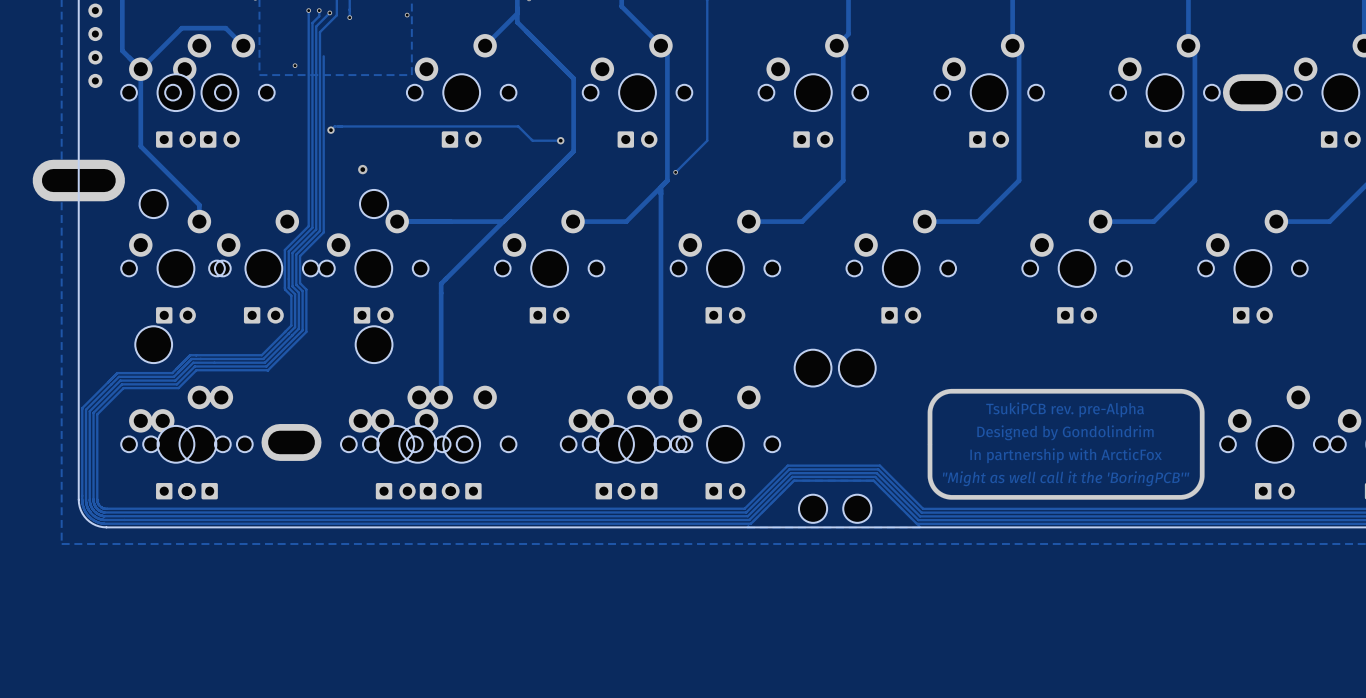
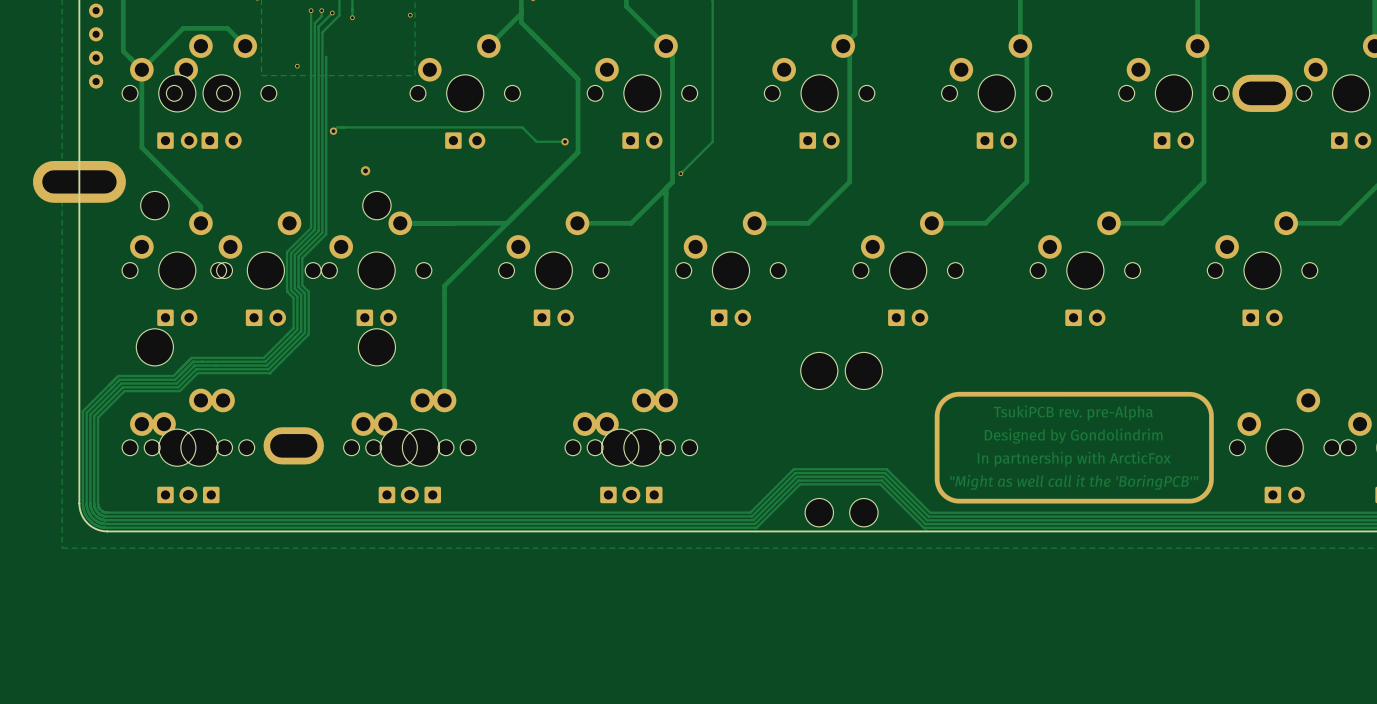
part: (461, 424) -> none
part: (725, 424) -> none
part: none -> (420, 494)
part: (439, 491) -> none
part: (461, 491) -> none
part: (725, 491) -> none

